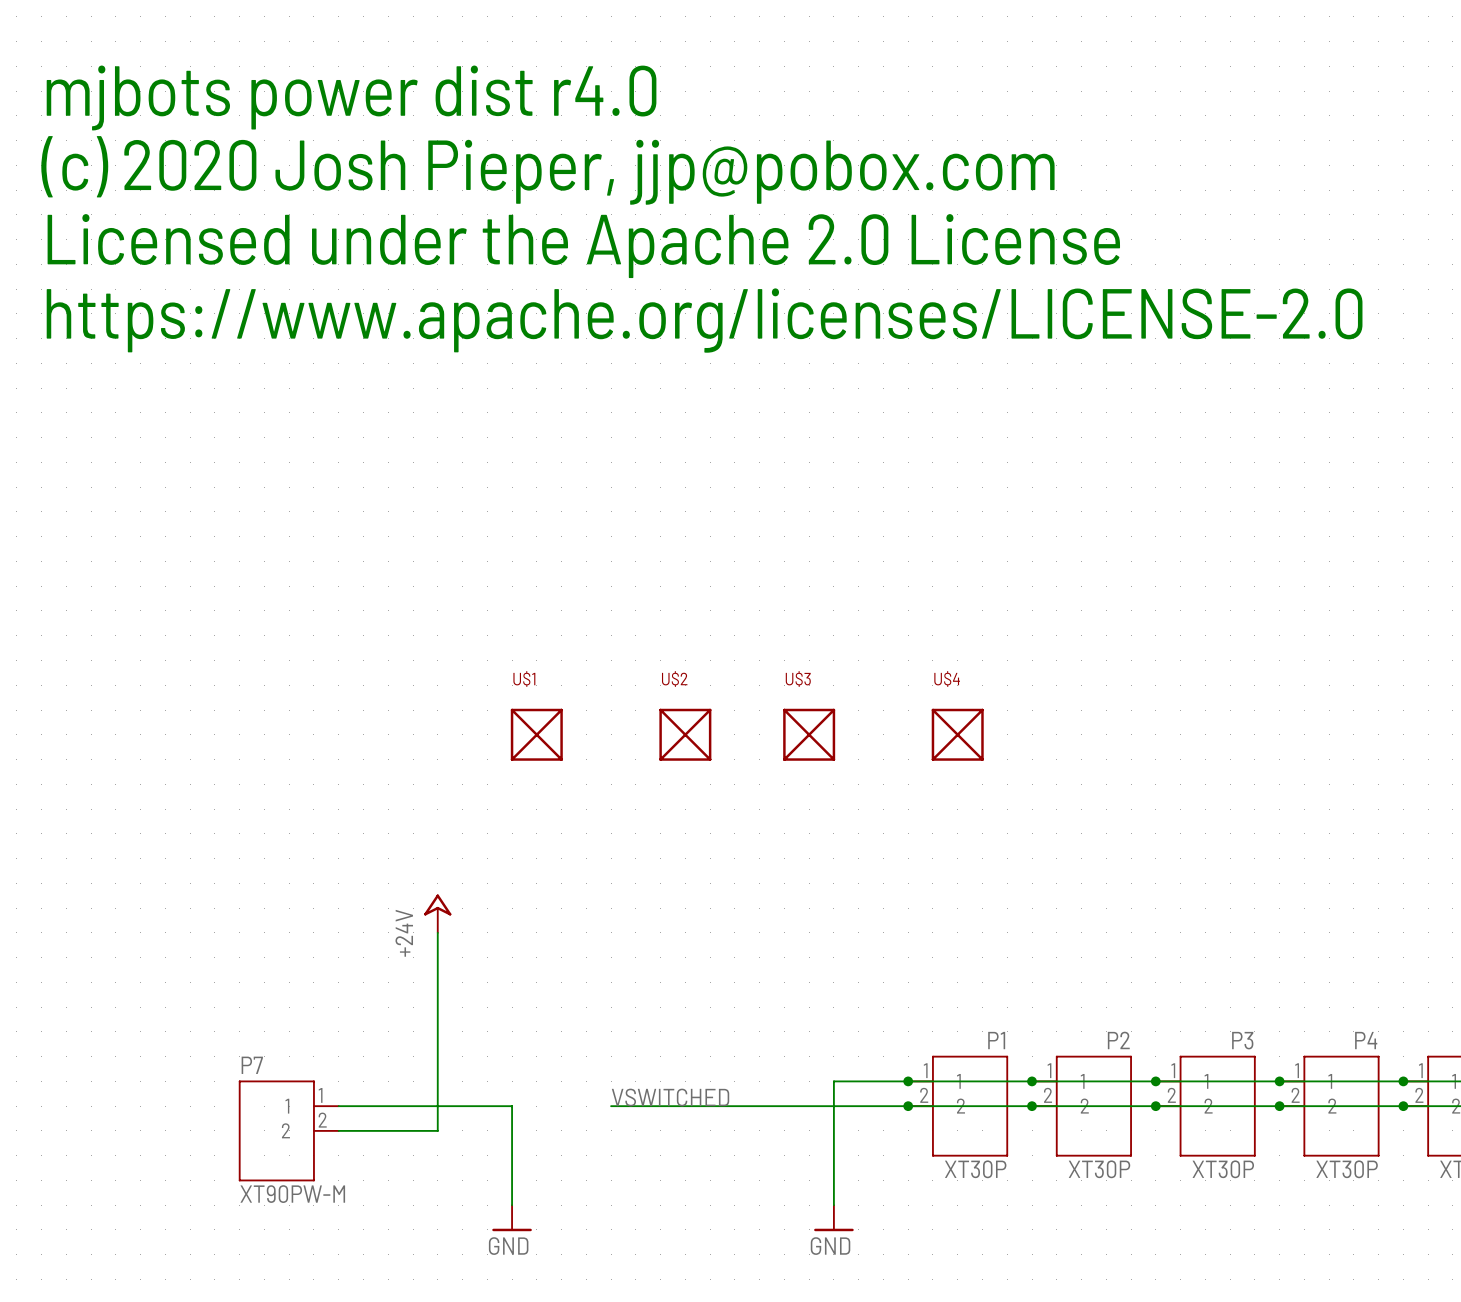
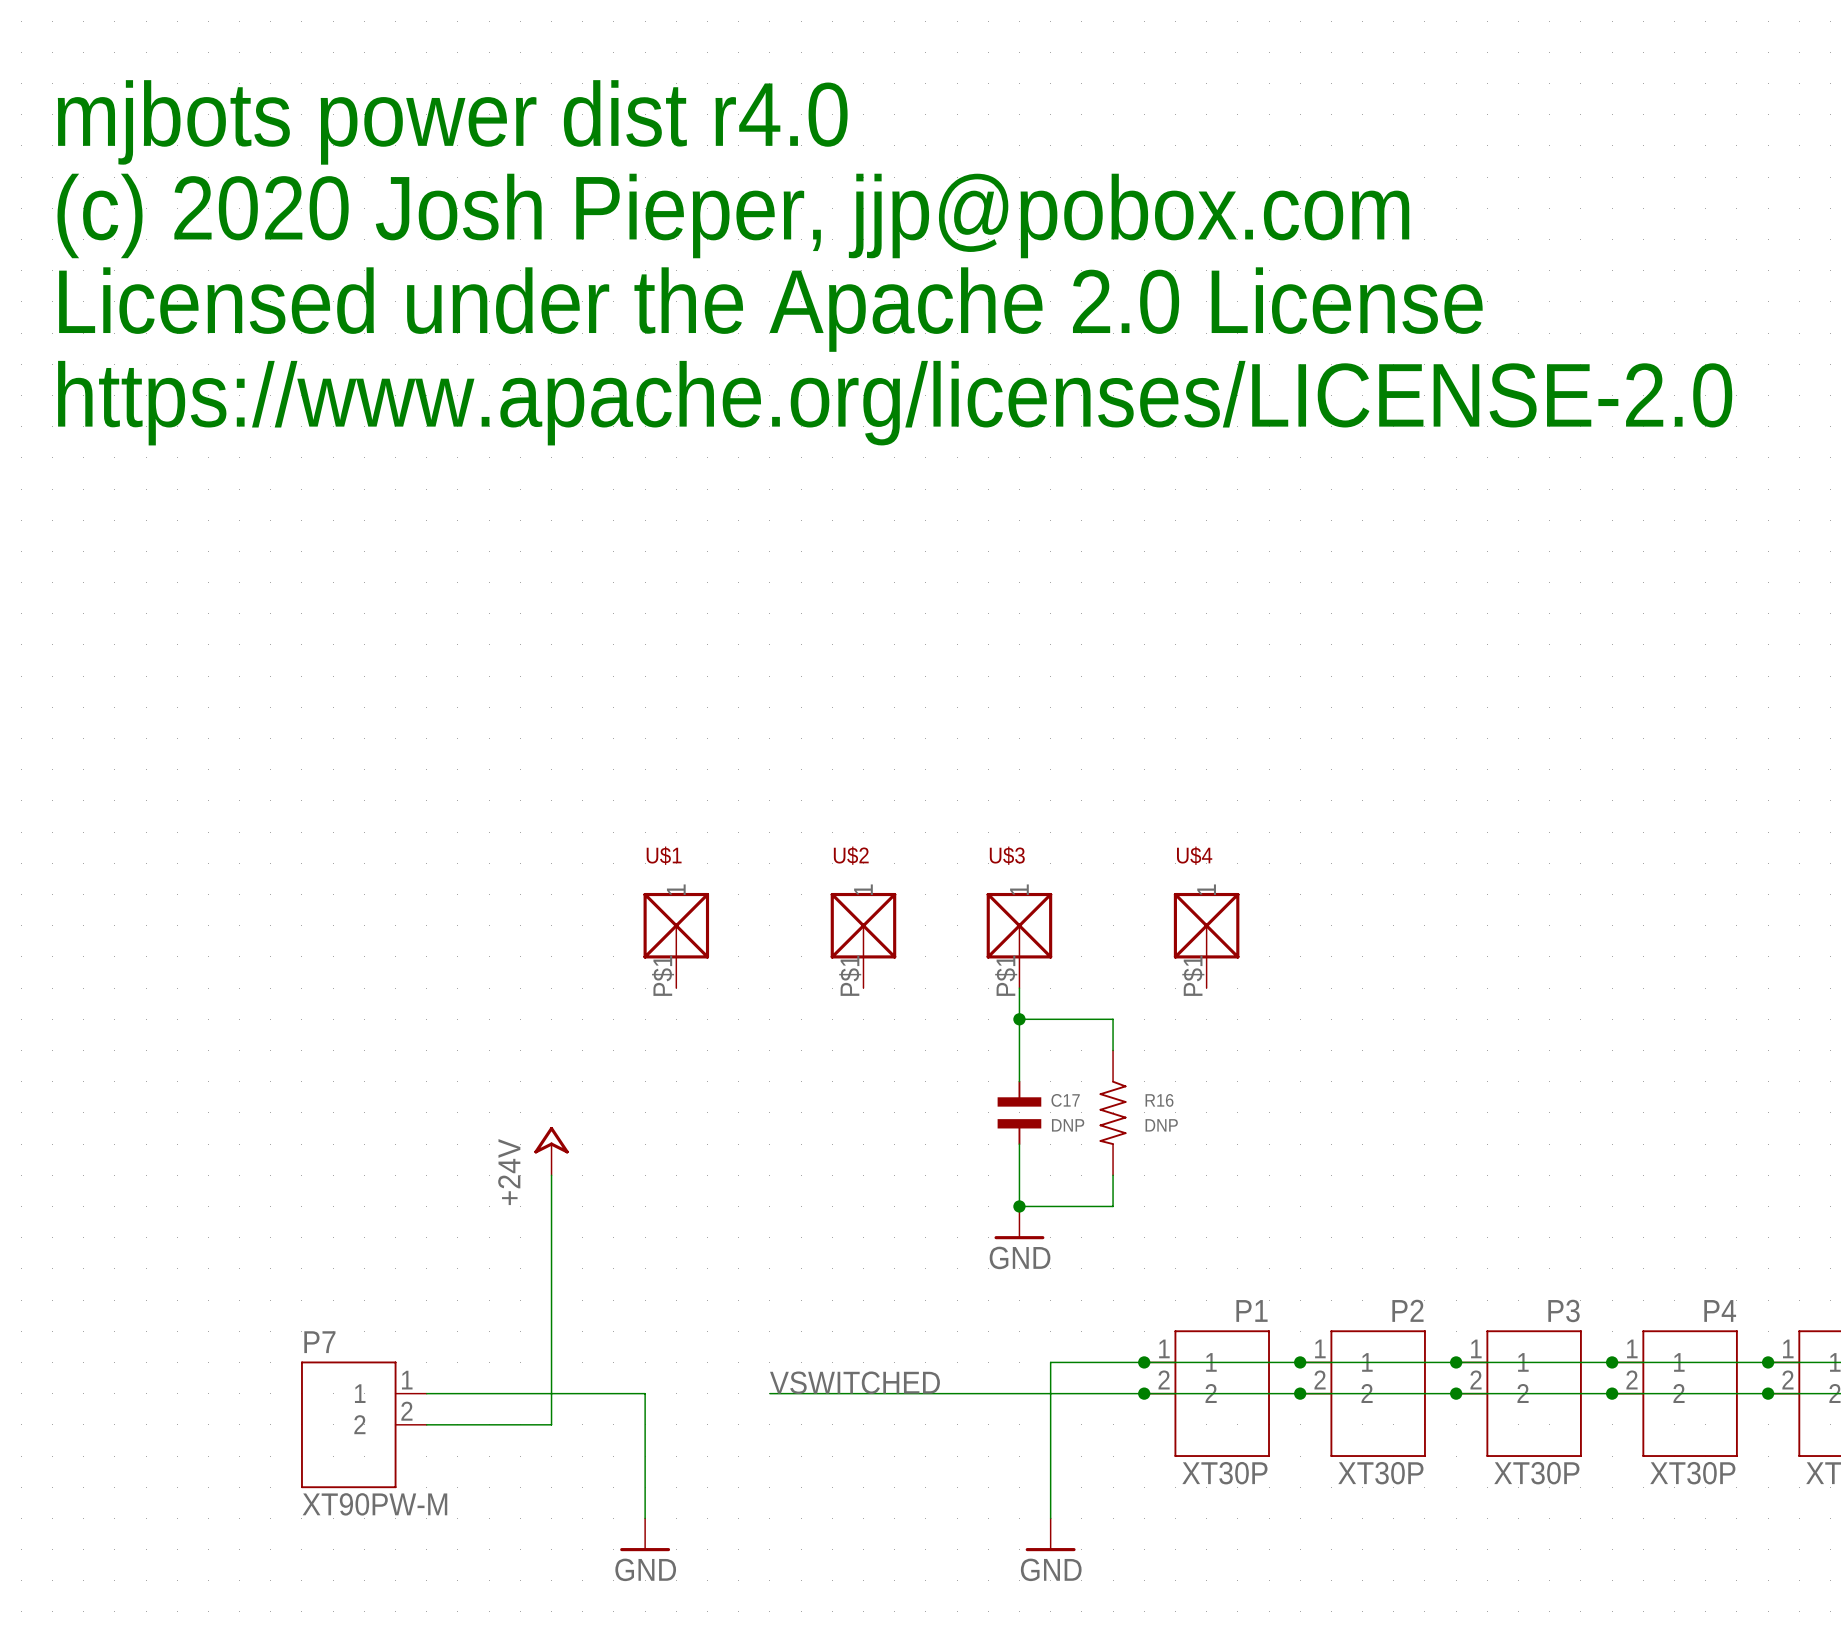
U$1 symbol: [510, 708, 563, 761] -> [643, 892, 710, 989]
U$2 symbol: [659, 708, 712, 761] -> [830, 892, 897, 989]
U$3 symbol: [783, 708, 836, 761] -> [986, 892, 1053, 989]
U$4 symbol: [931, 708, 984, 761] -> [1173, 892, 1240, 989]
wire: none -> (1019, 988) (1019, 1081)
wire: none -> (1019, 1019) (1113, 1019) (1113, 1050)
junction: none -> (1019, 1019)
C17: none -> DNP (1019, 1112)
R16: none -> DNP (1113, 1112)
wire: none -> (1019, 1144) (1019, 1206) (1113, 1206) (1113, 1175)
junction: none -> (1019, 1206)
power symbol: none -> GND (1019, 1222)

